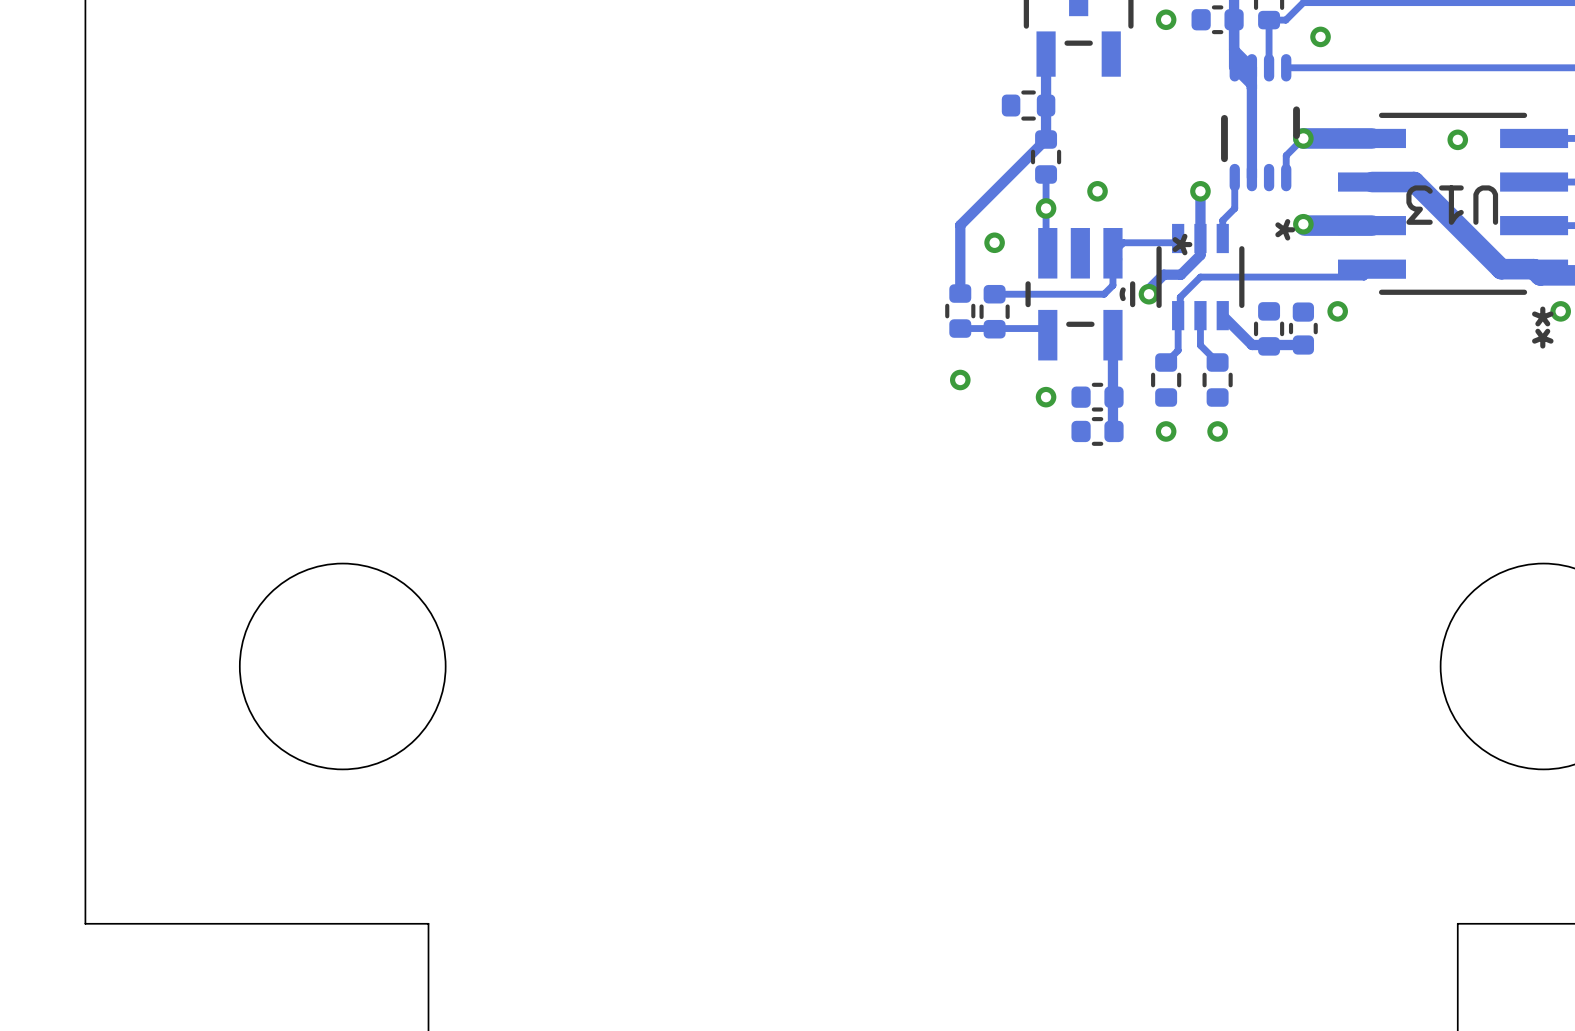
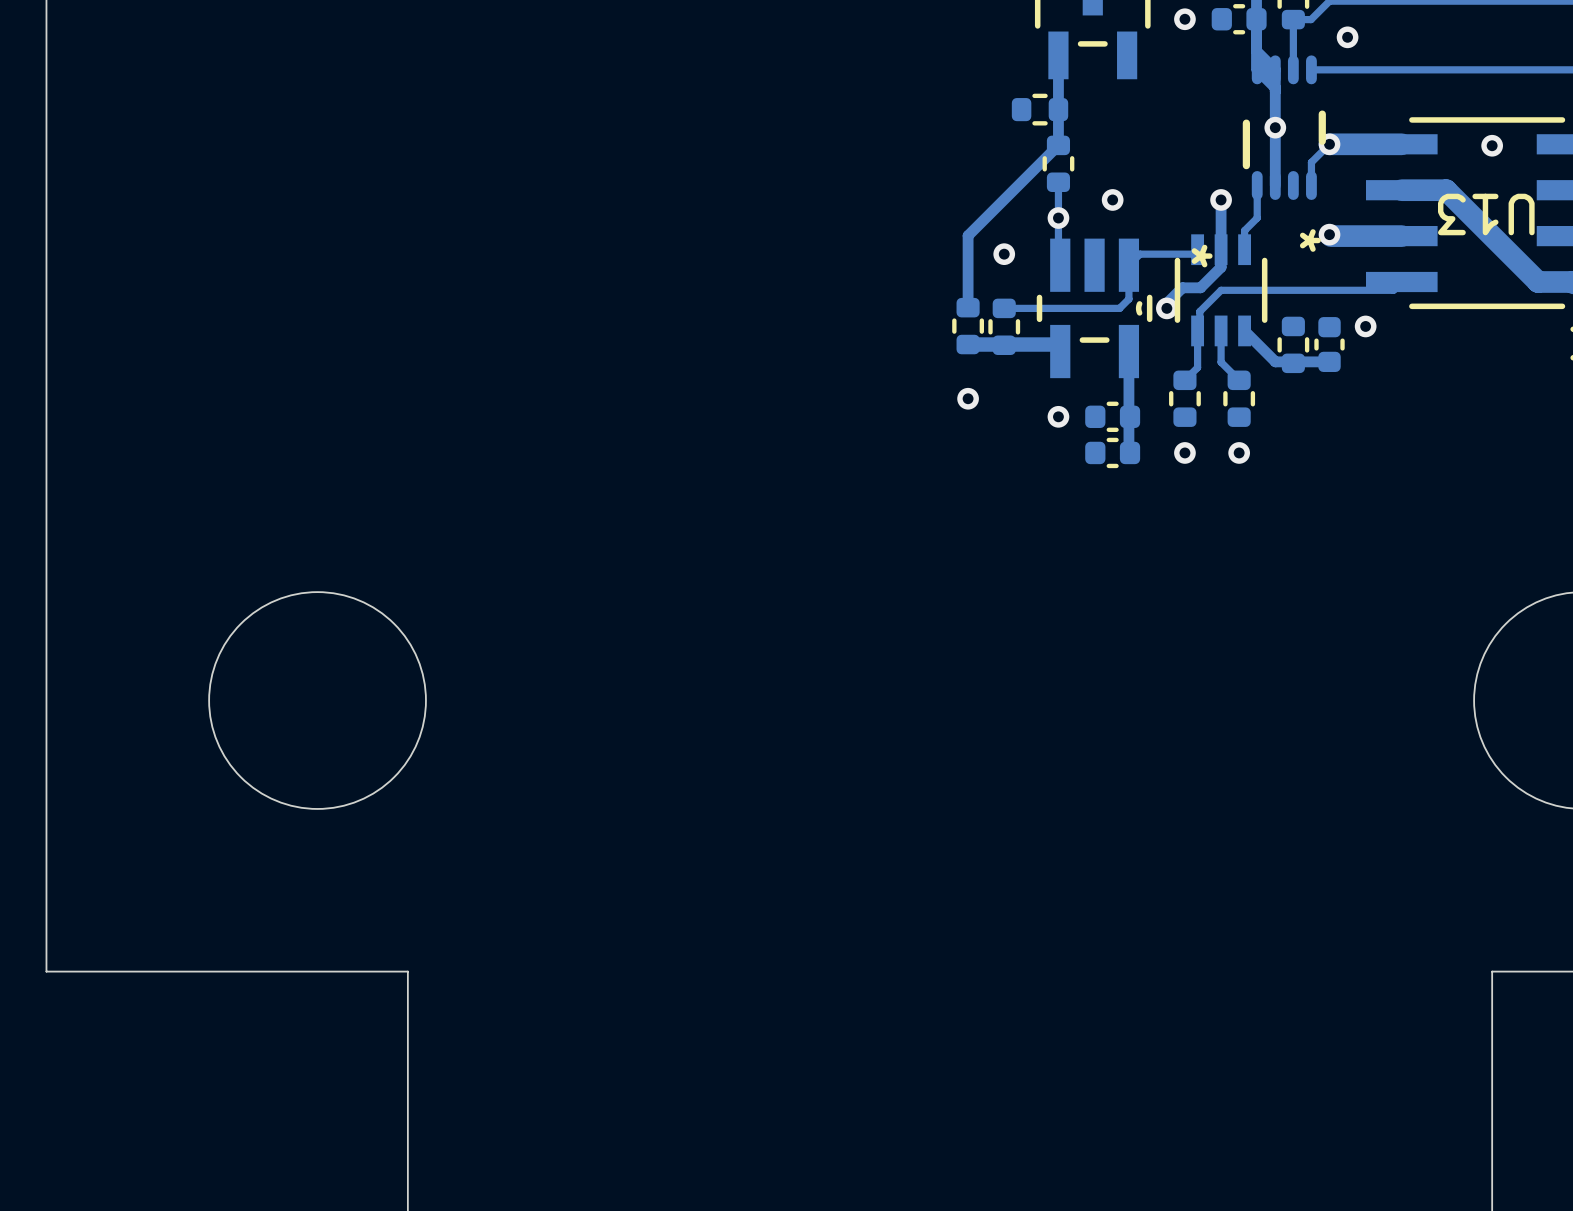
via: none -> (1275, 127)
track width: thin (1041, 328) (960, 328) -> thick (1053, 344) (968, 344)

